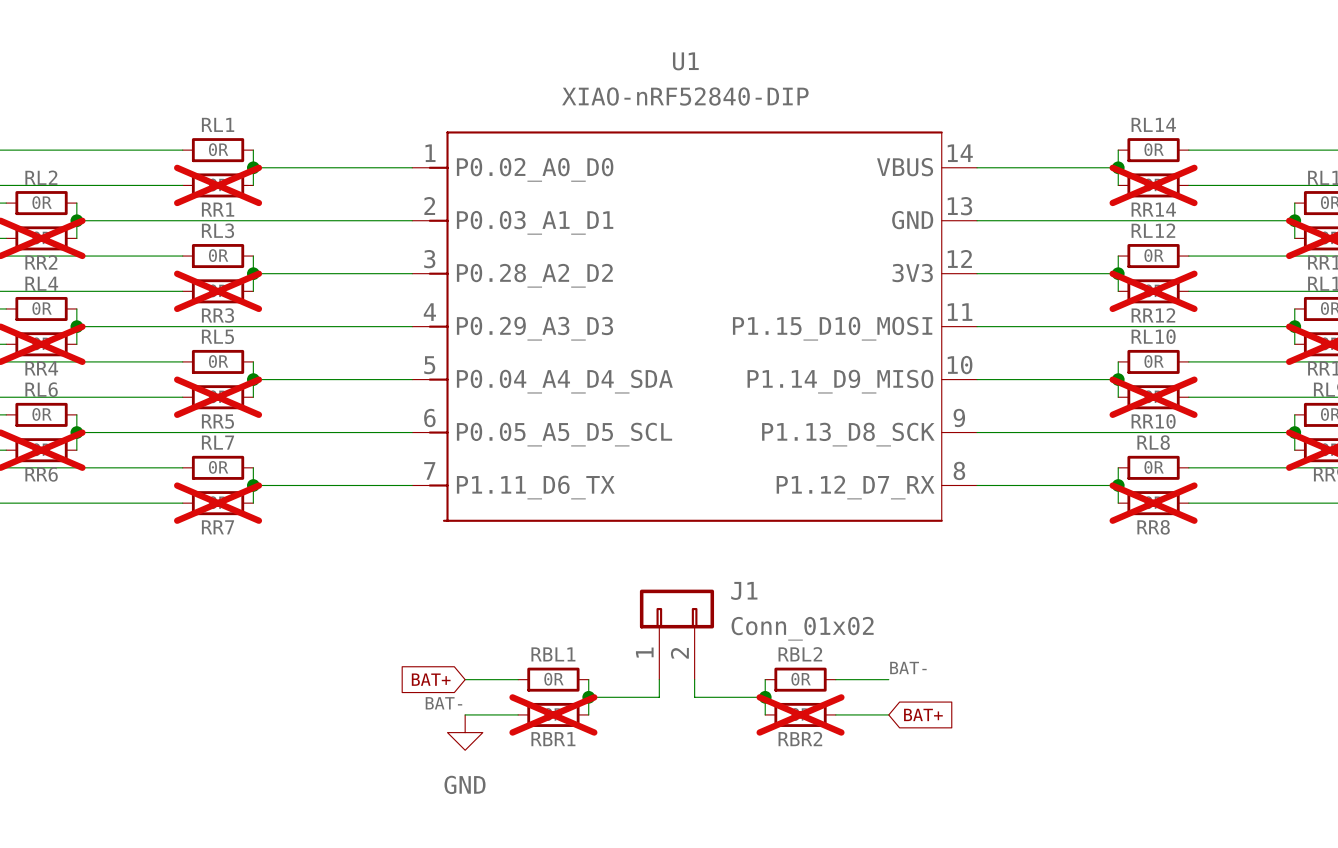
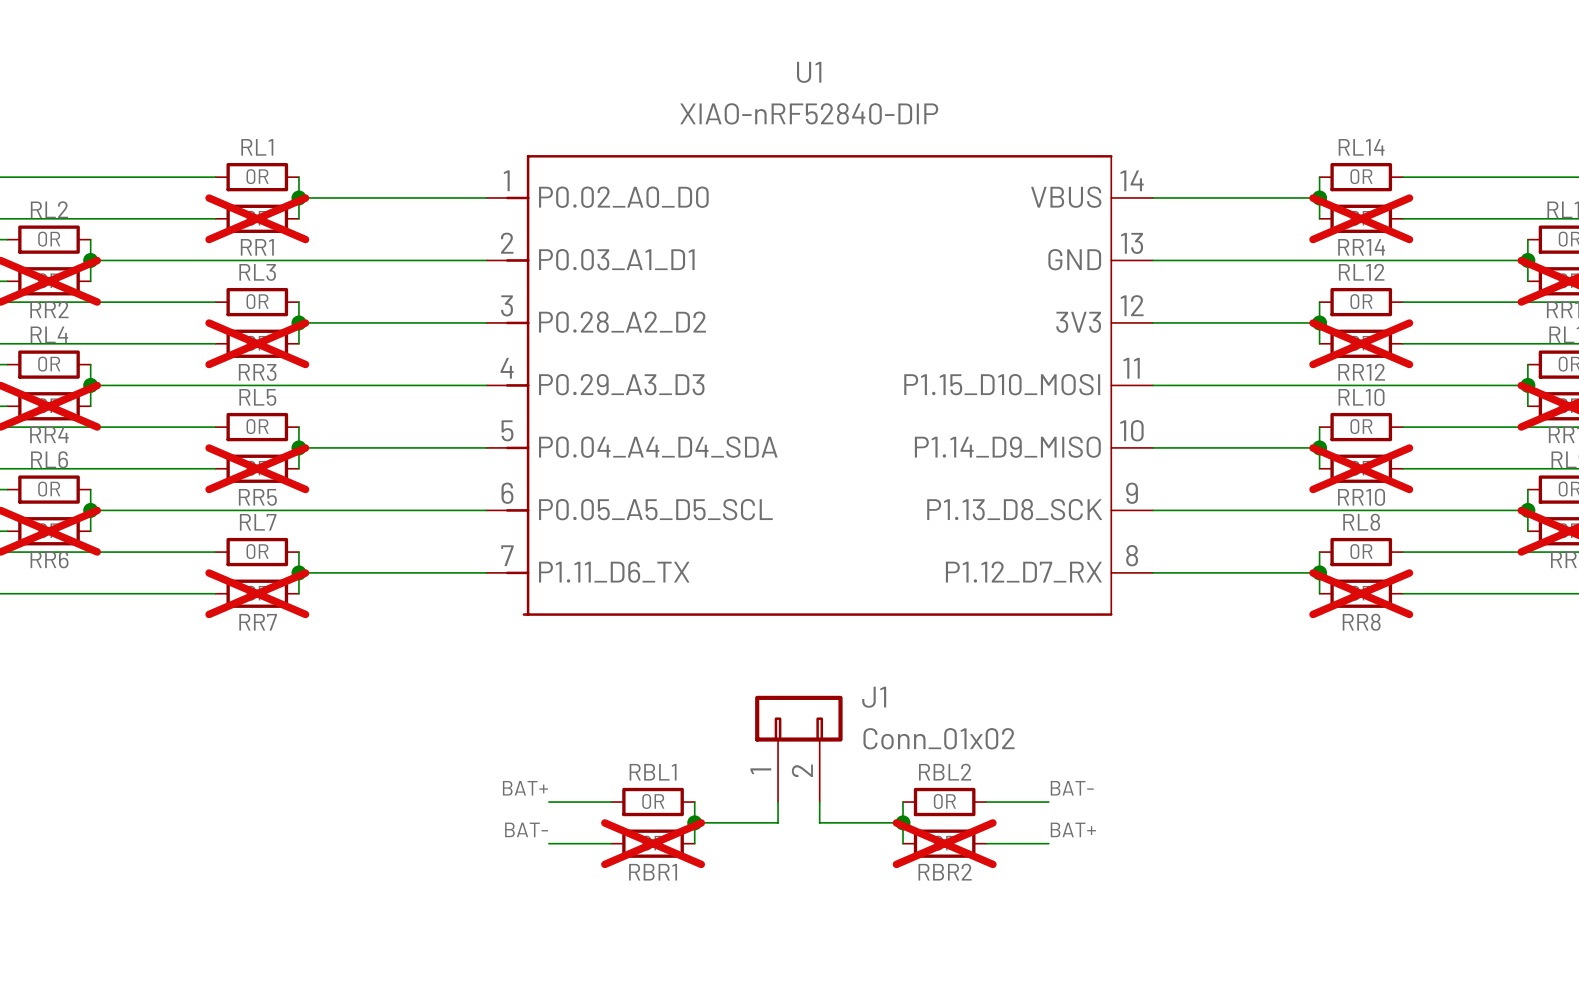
label: none -> BAT+ (525, 788)
global label: BAT+ (431, 679) -> none
label: none -> BAT+ (1073, 829)
global label: BAT+ (923, 714) -> none
power symbol: GND (465, 732) -> none

